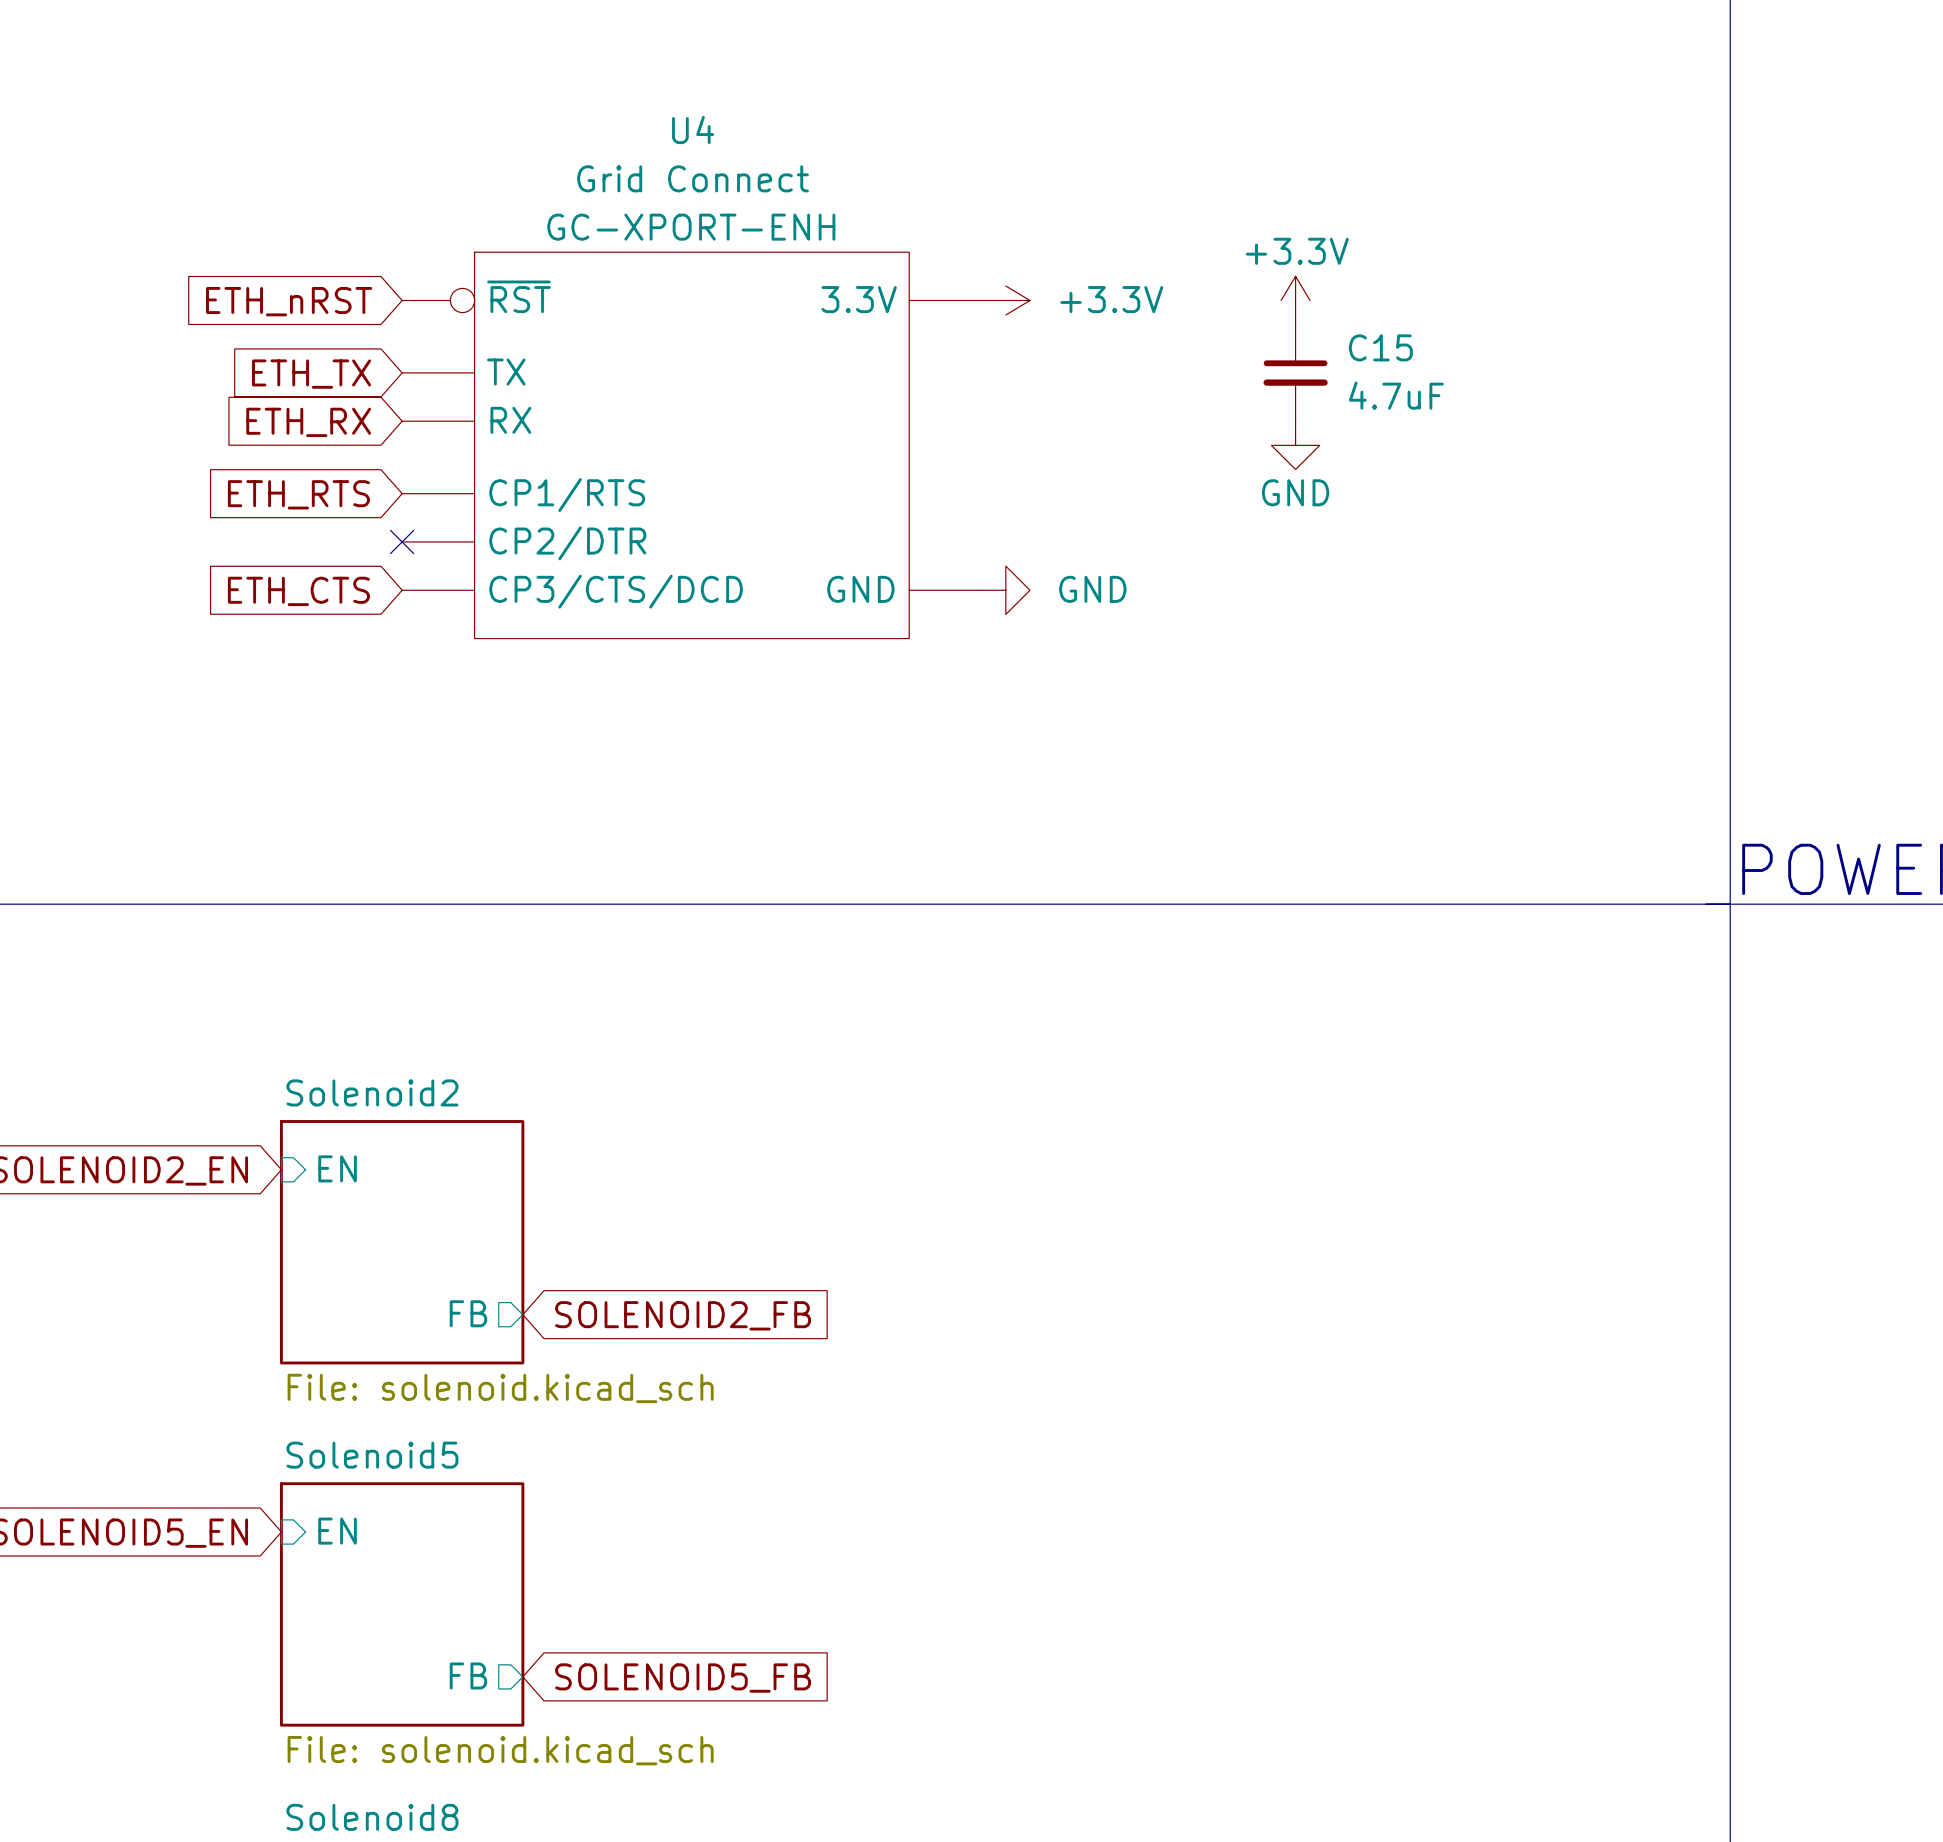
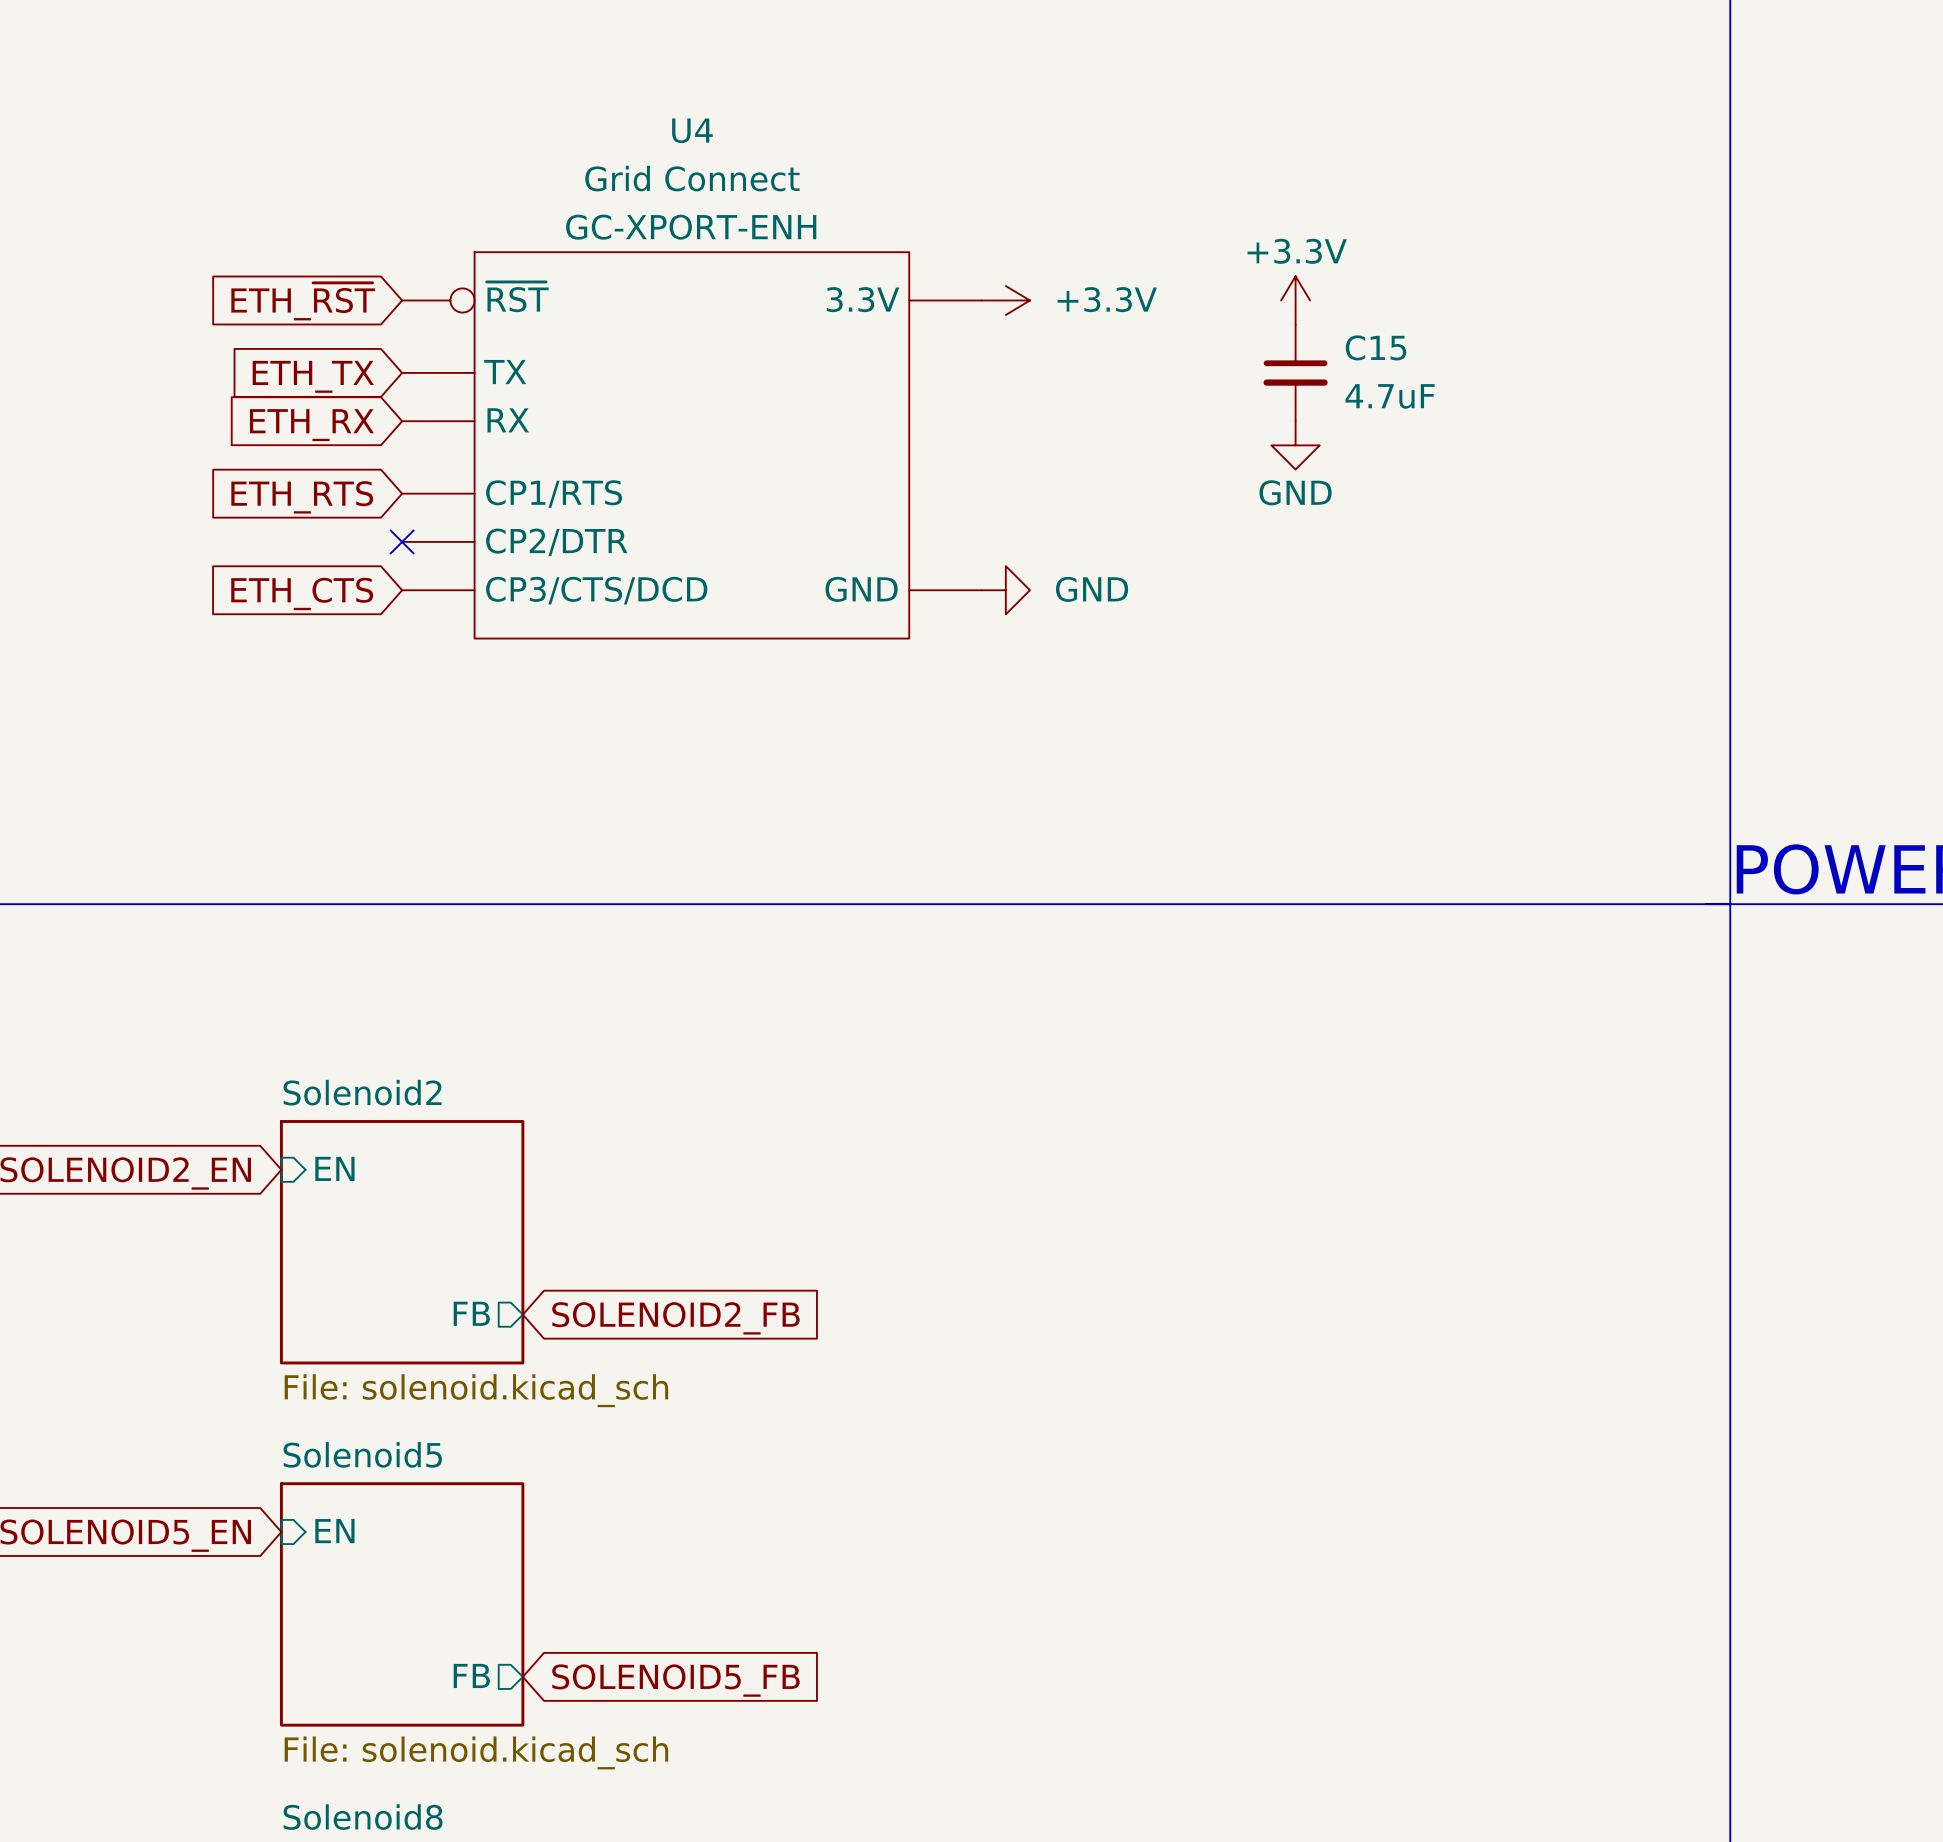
global label: ETH_nRST (289, 301) -> ETH_~{RST} (303, 301)

